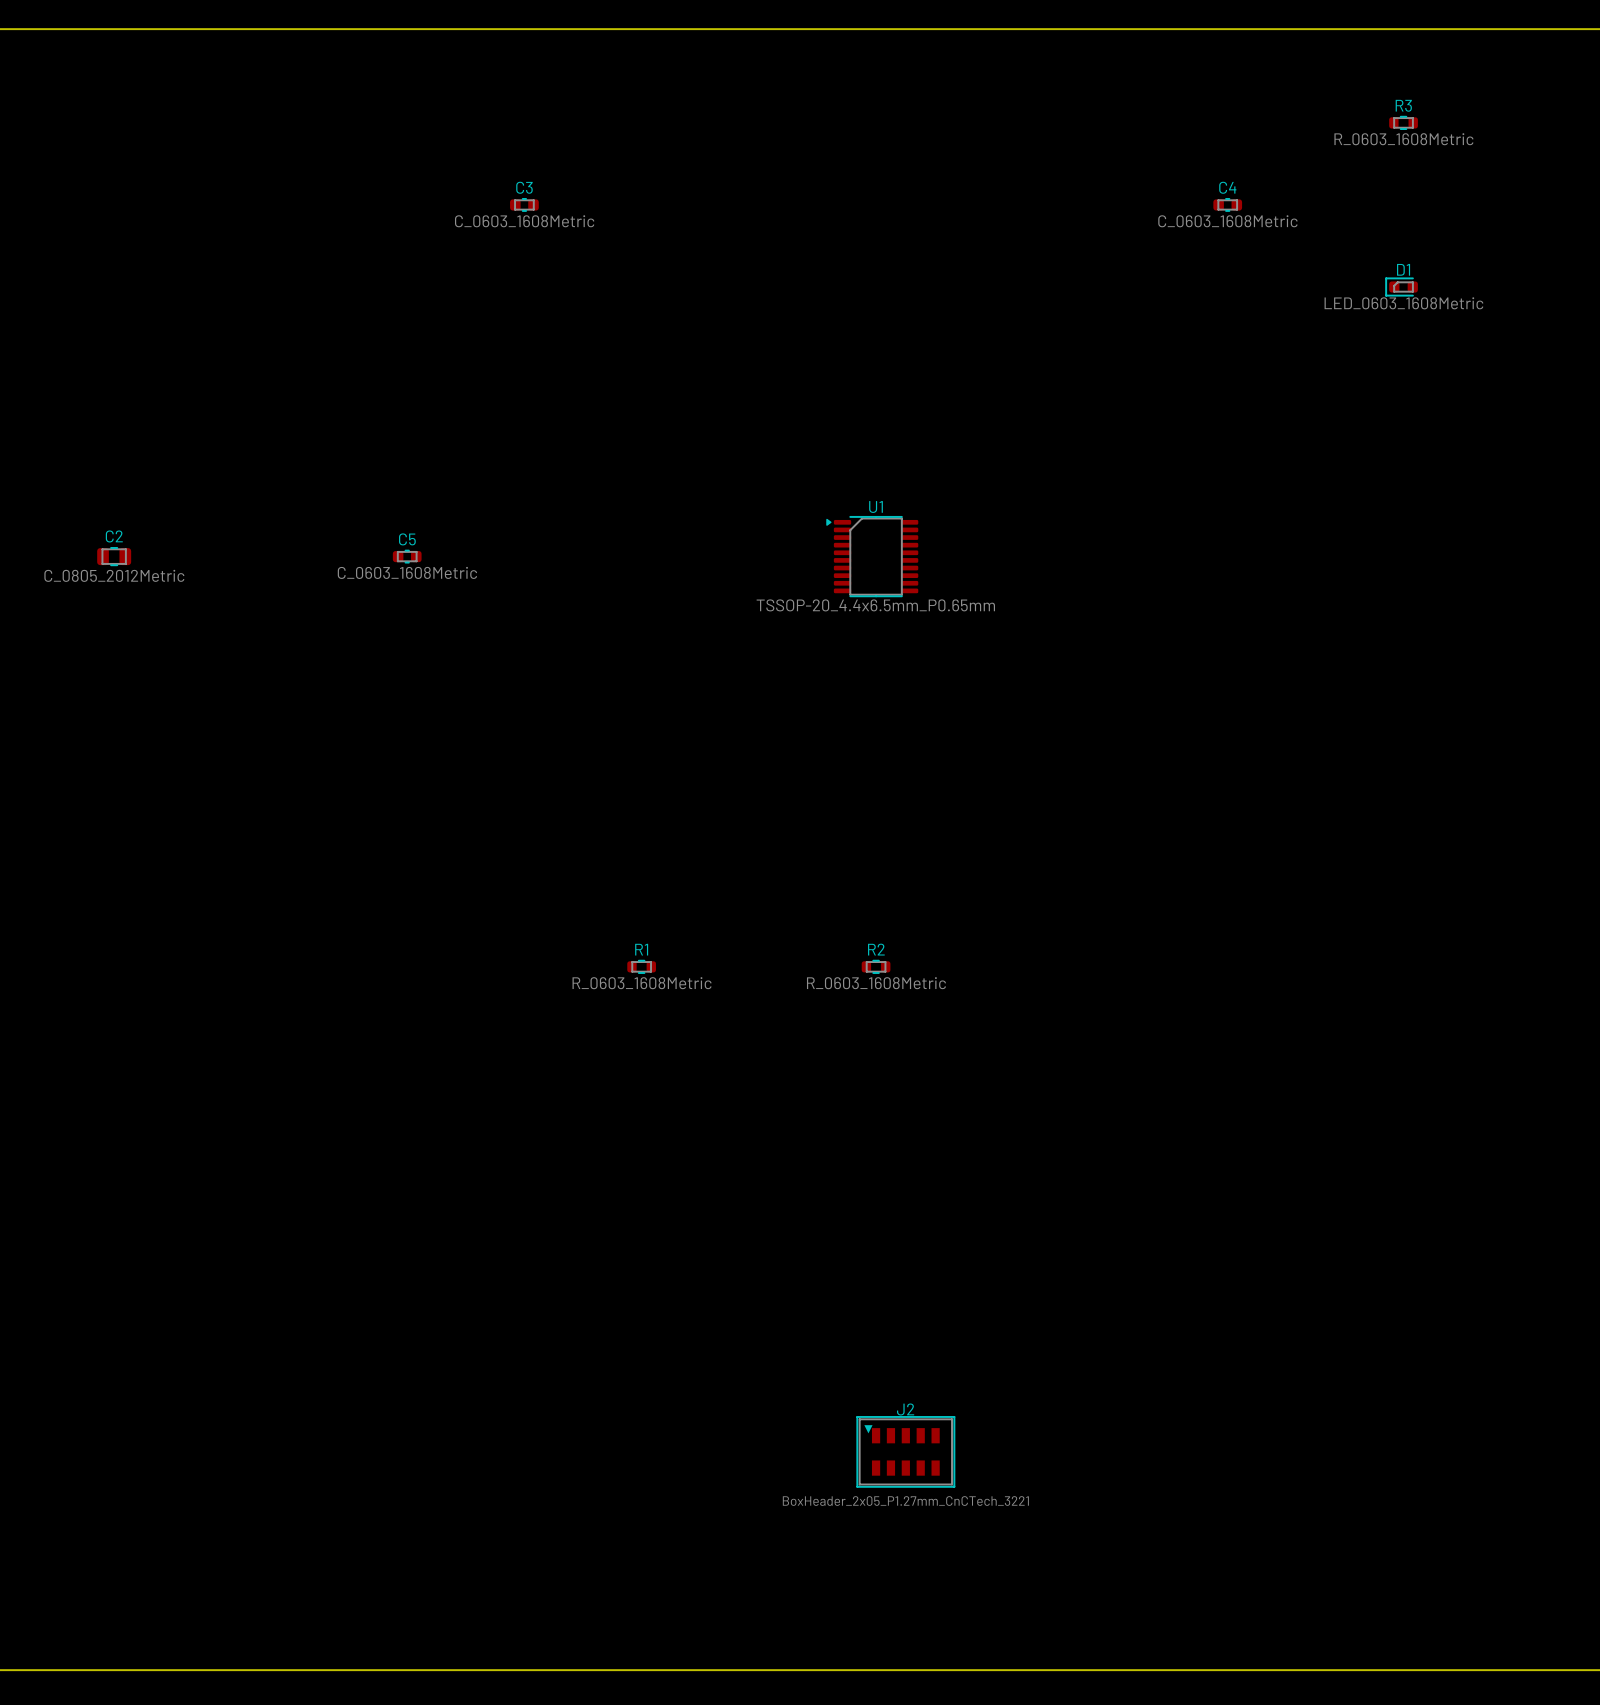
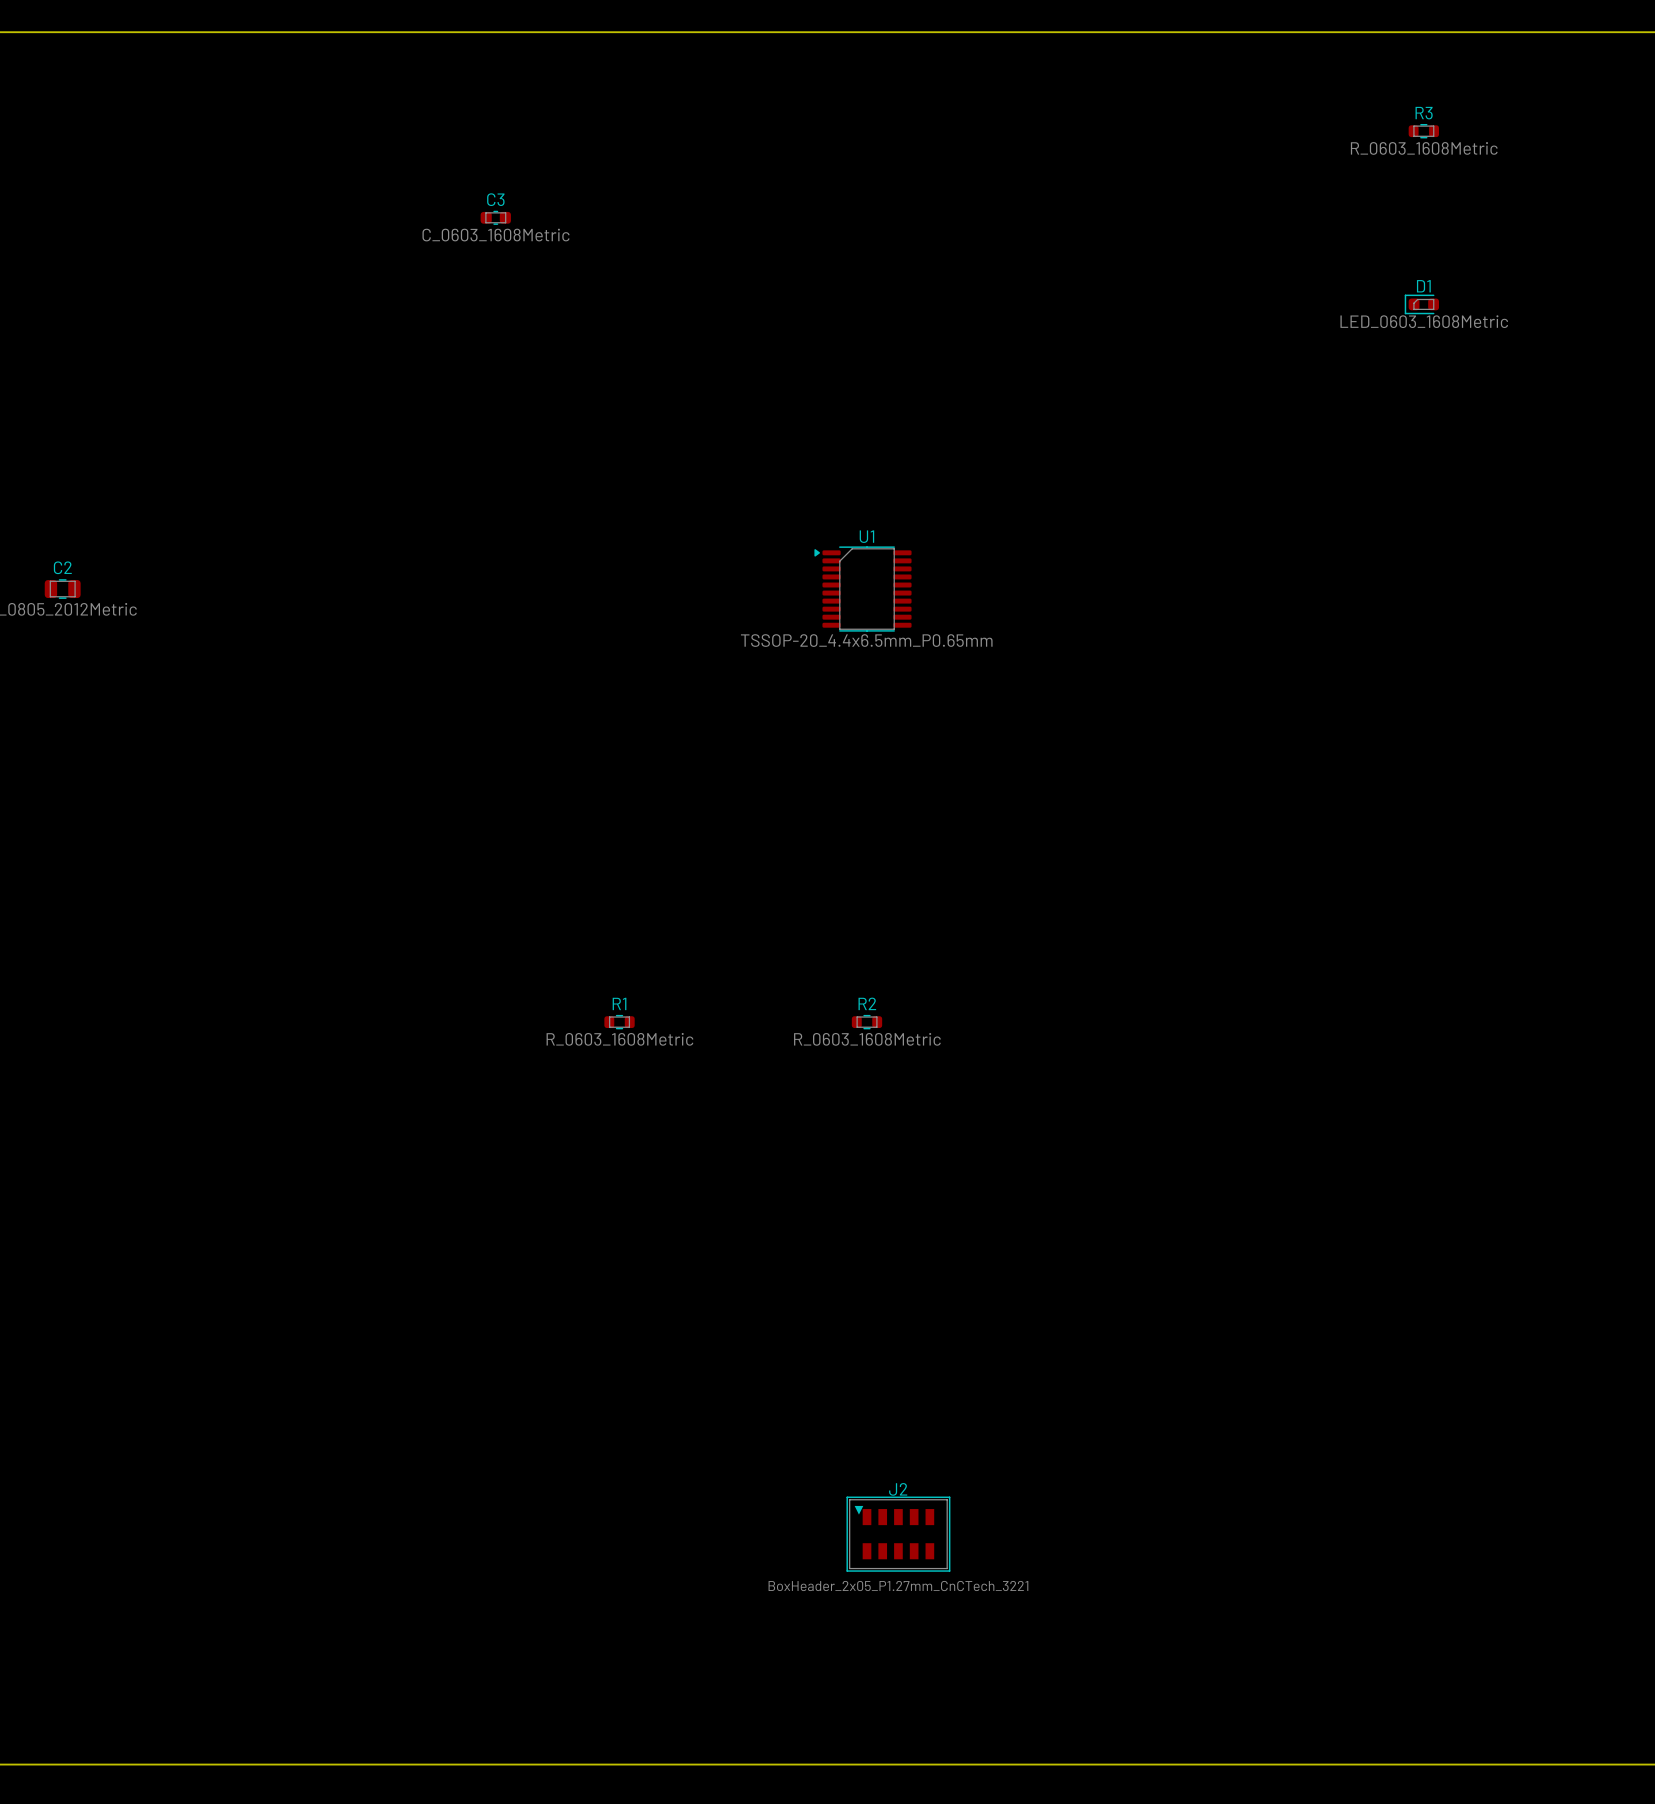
C4: C_0603_1608Metric (1227, 204) -> none
C5: C_0603_1608Metric (407, 556) -> none

